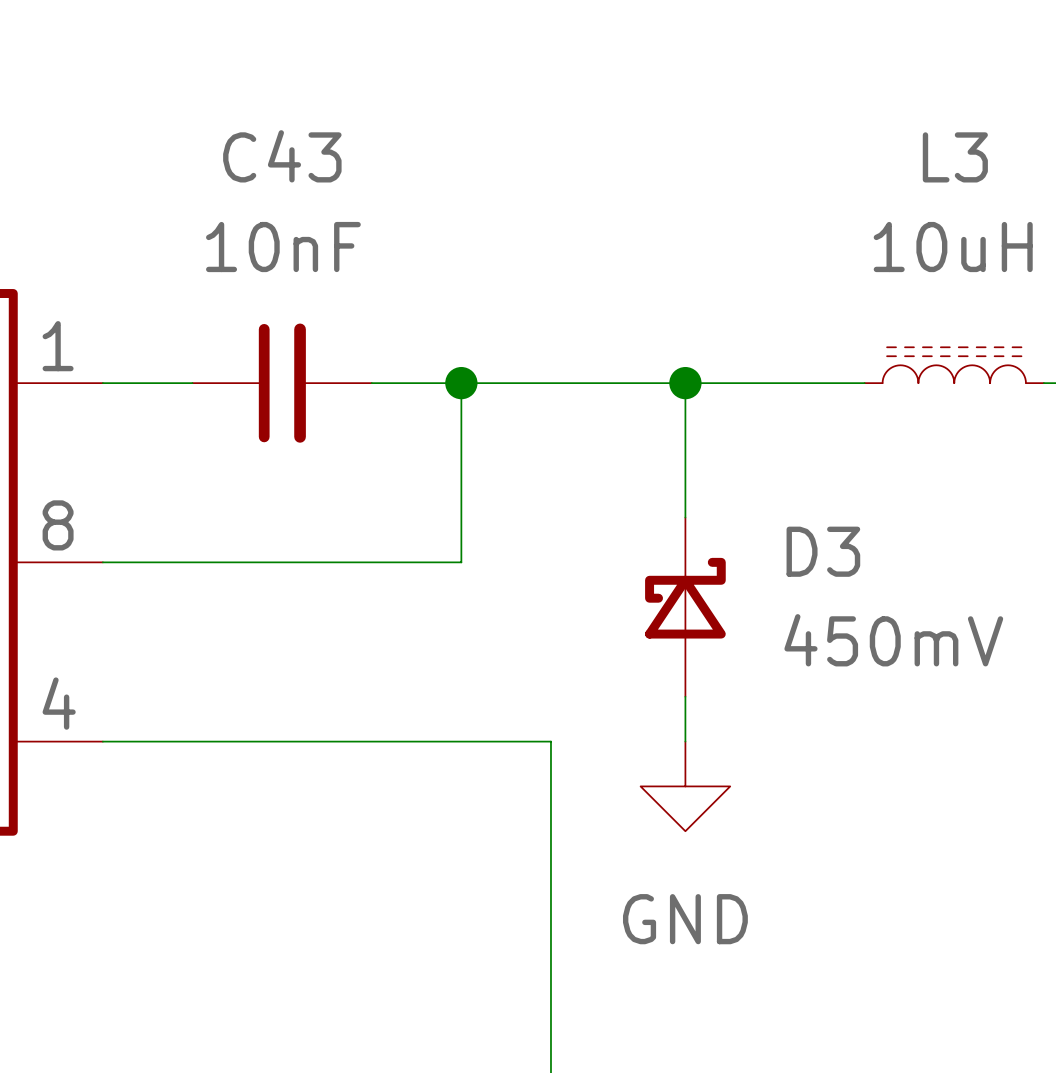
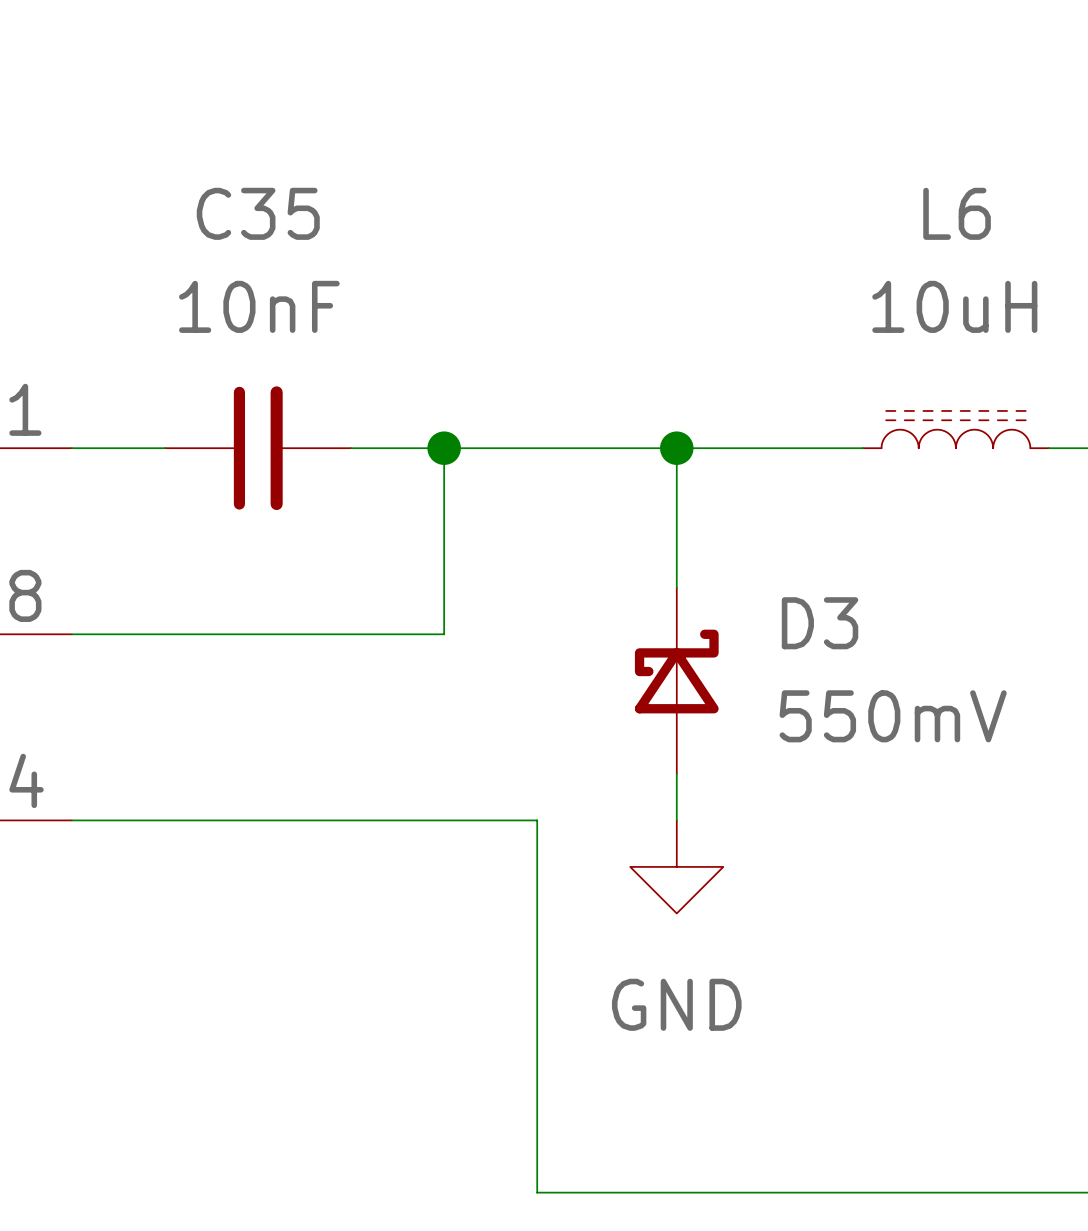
C43 name: C43 (282, 156) -> C35 (258, 213)
L3 name: L3 (955, 157) -> L6 (957, 213)
D3 value: 450mV (893, 640) -> 550mV (893, 716)

